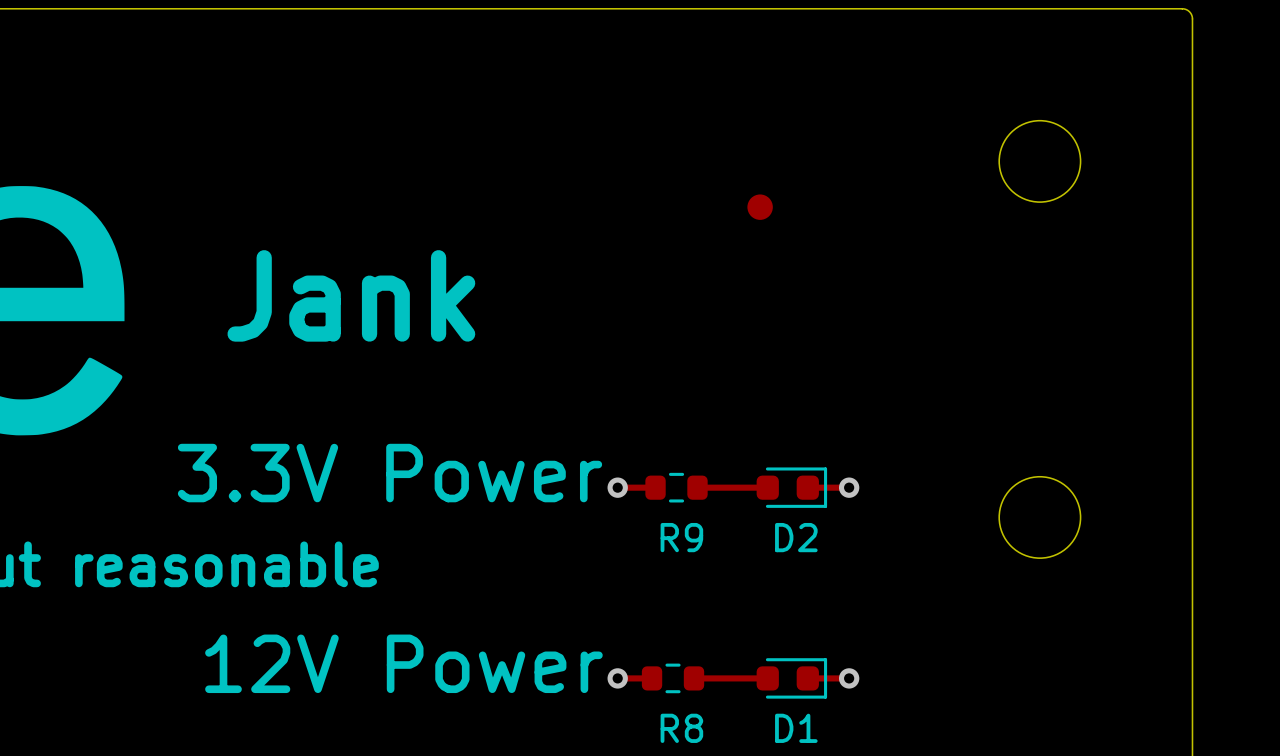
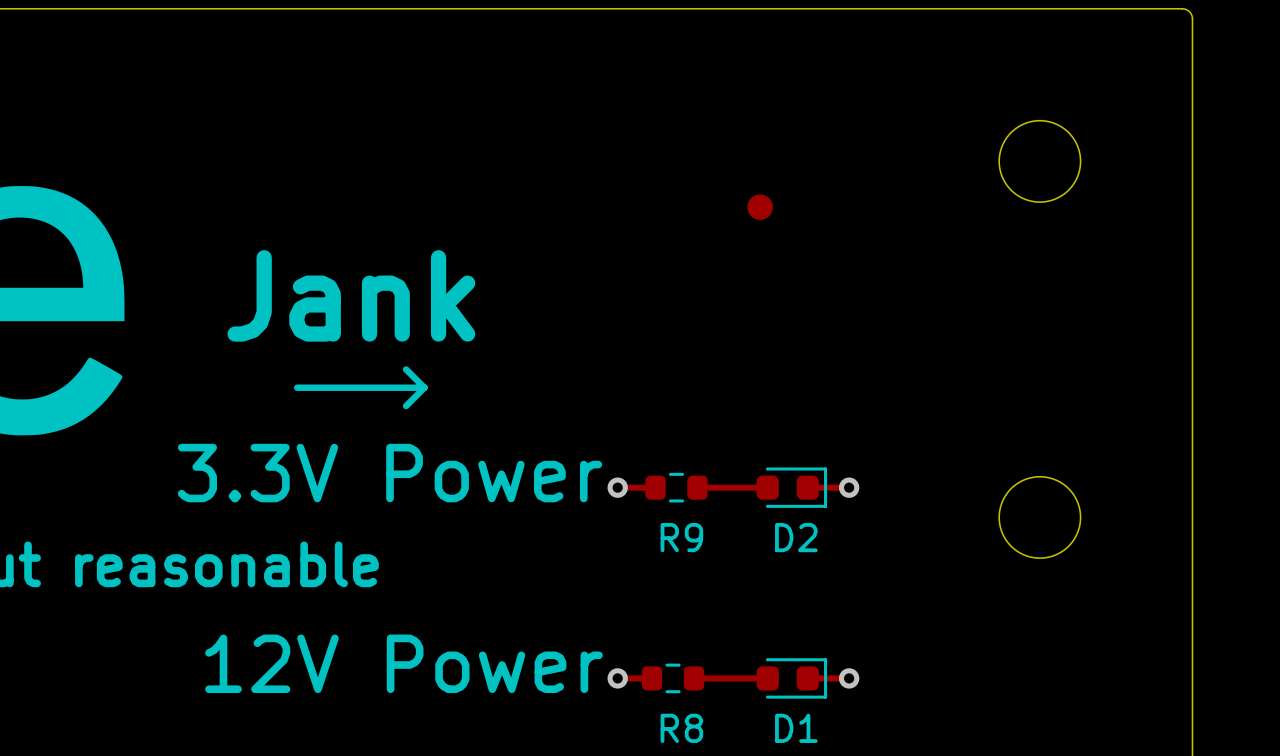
line: none -> (406, 369) (424, 387)
line: none -> (297, 387) (424, 387)
line: none -> (424, 387) (406, 406)

